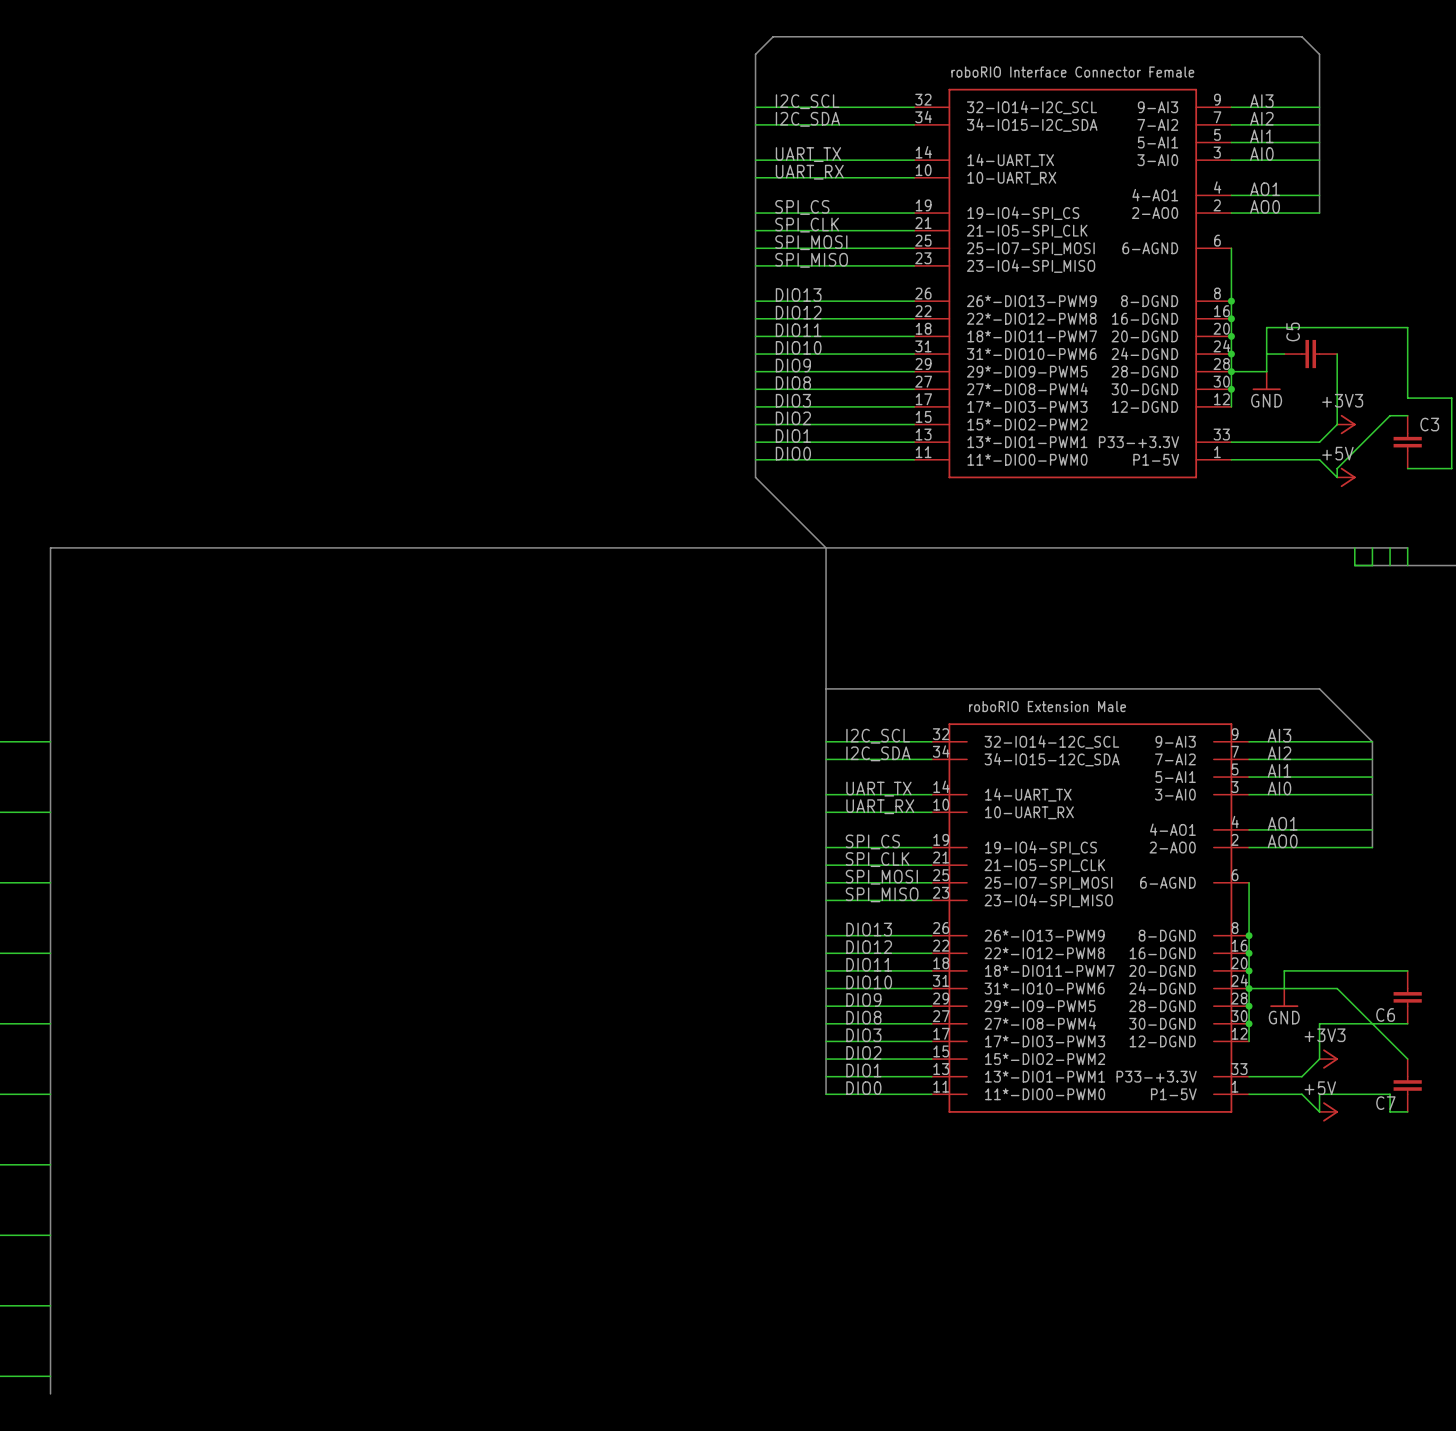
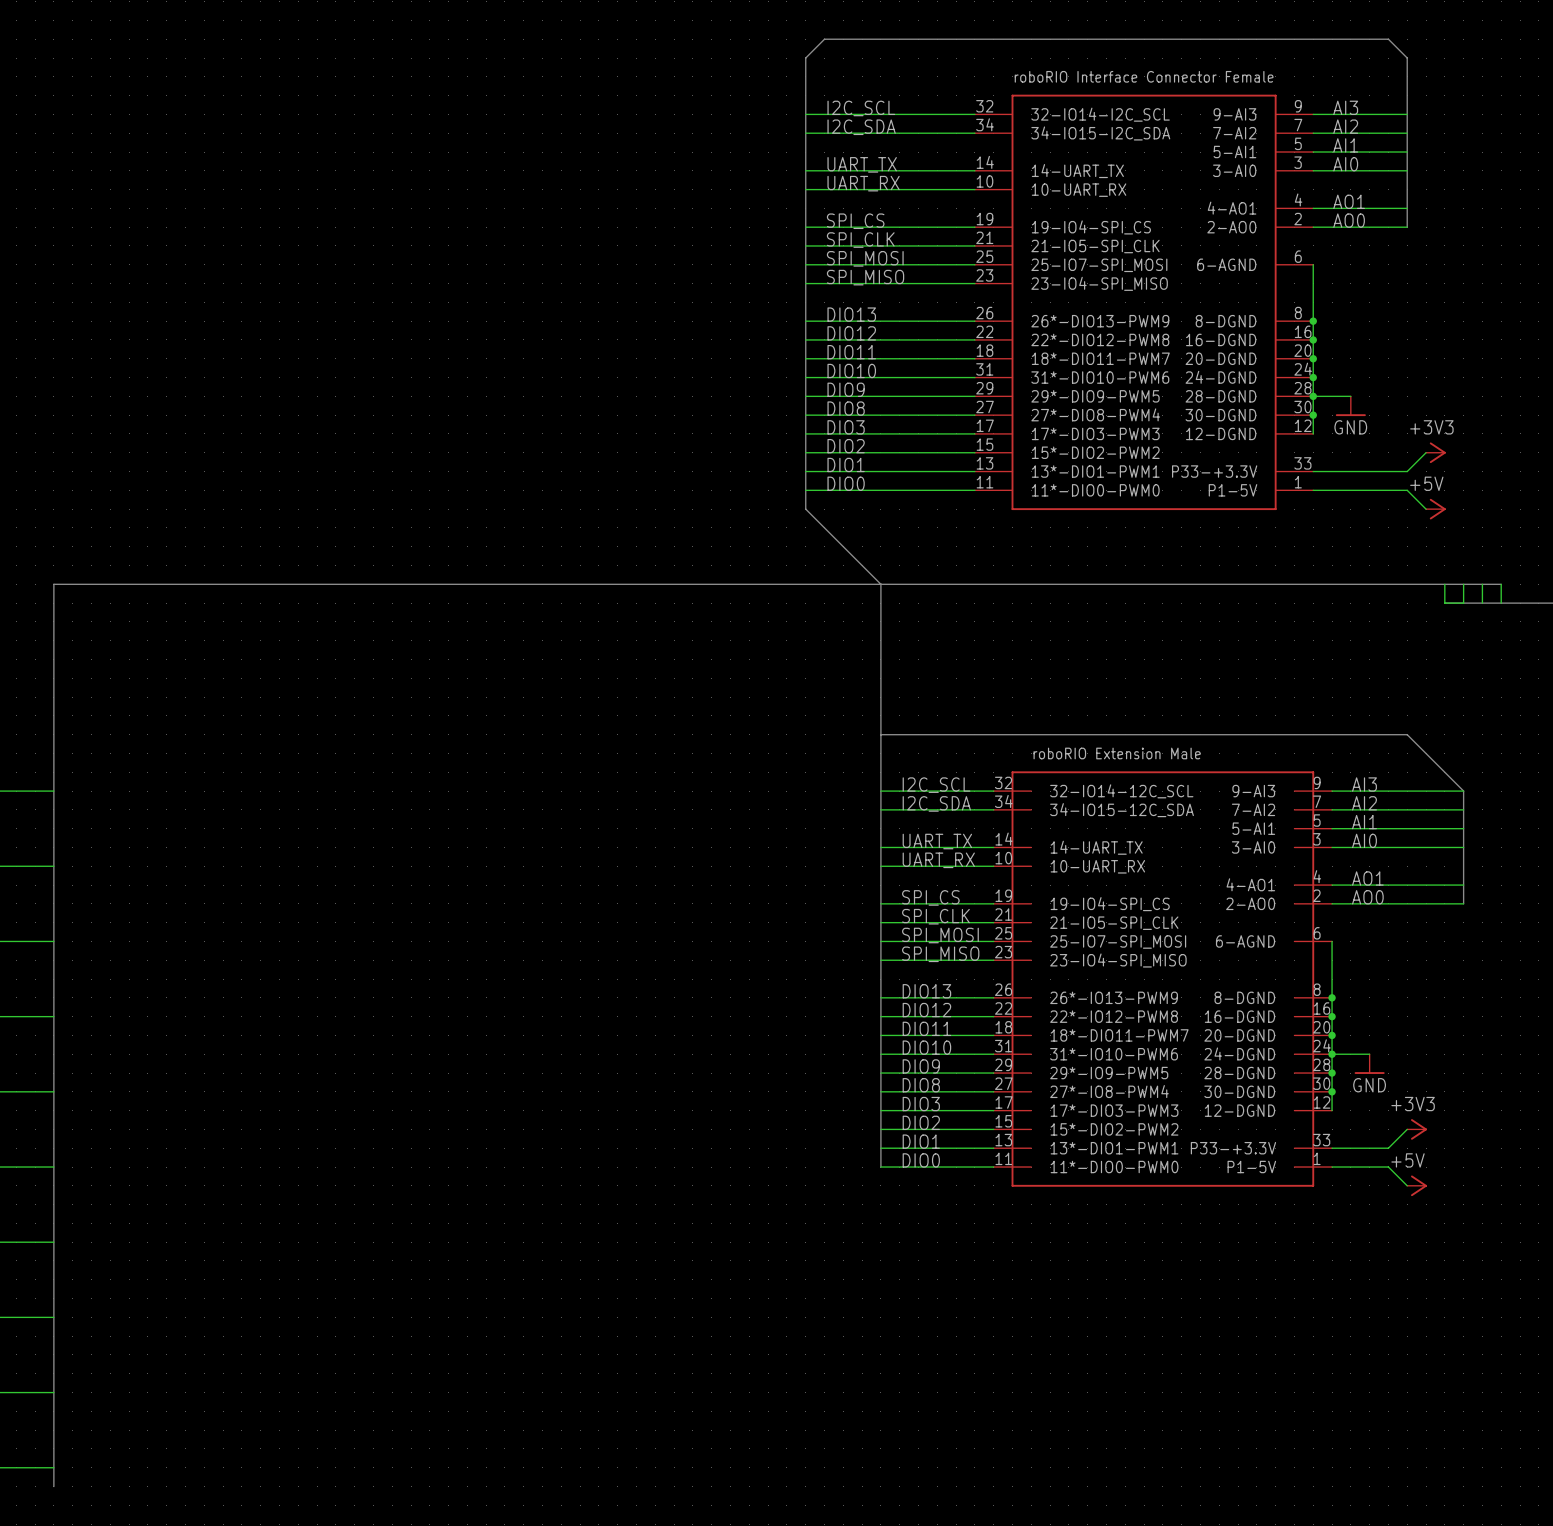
wire: (1266, 354) (1284, 354) -> none
C5: (1310, 354) -> none
wire: (1337, 354) (1337, 424) -> none
wire: (1266, 371) (1266, 327) (1407, 327) (1407, 398) (1451, 398) (1451, 468) (1407, 468) -> none
wire: (1407, 415) (1390, 415) (1337, 468) (1337, 477) -> none
C3: (1407, 442) -> none
wire: (1407, 970) (1284, 970) (1284, 988) (1337, 988) (1407, 1059) -> none
C6: (1407, 997) -> none
wire: (1407, 1023) (1319, 1023) (1319, 1059) -> none
C7: (1407, 1085) -> none
wire: (1319, 1111) (1319, 1094) (1390, 1094) (1390, 1111) (1407, 1111) -> none

